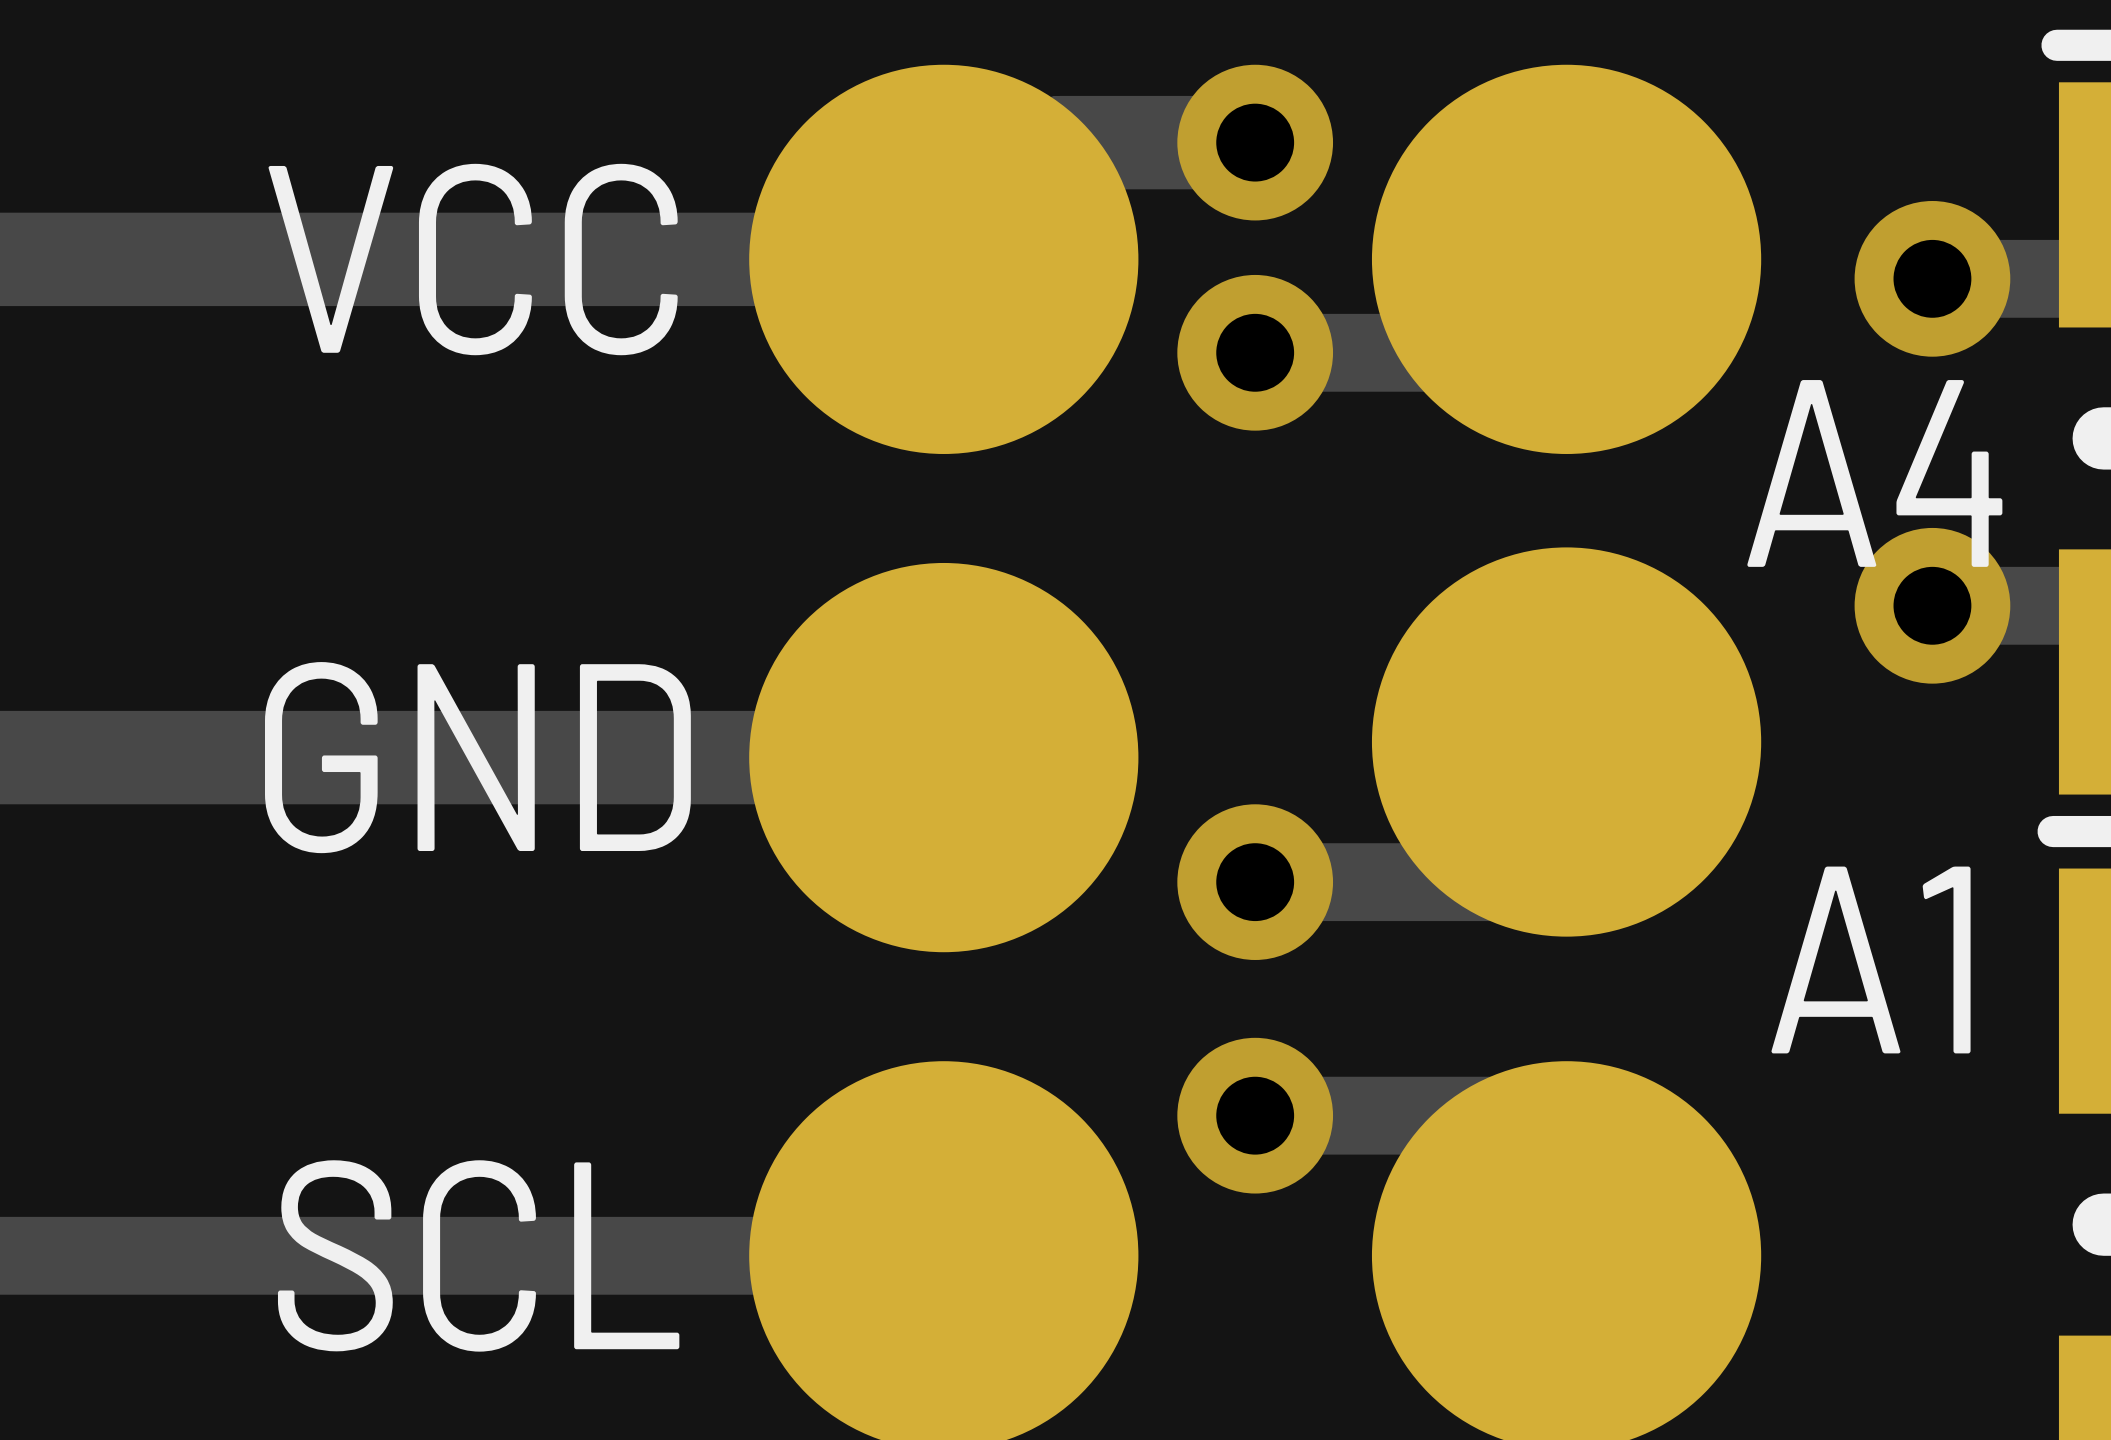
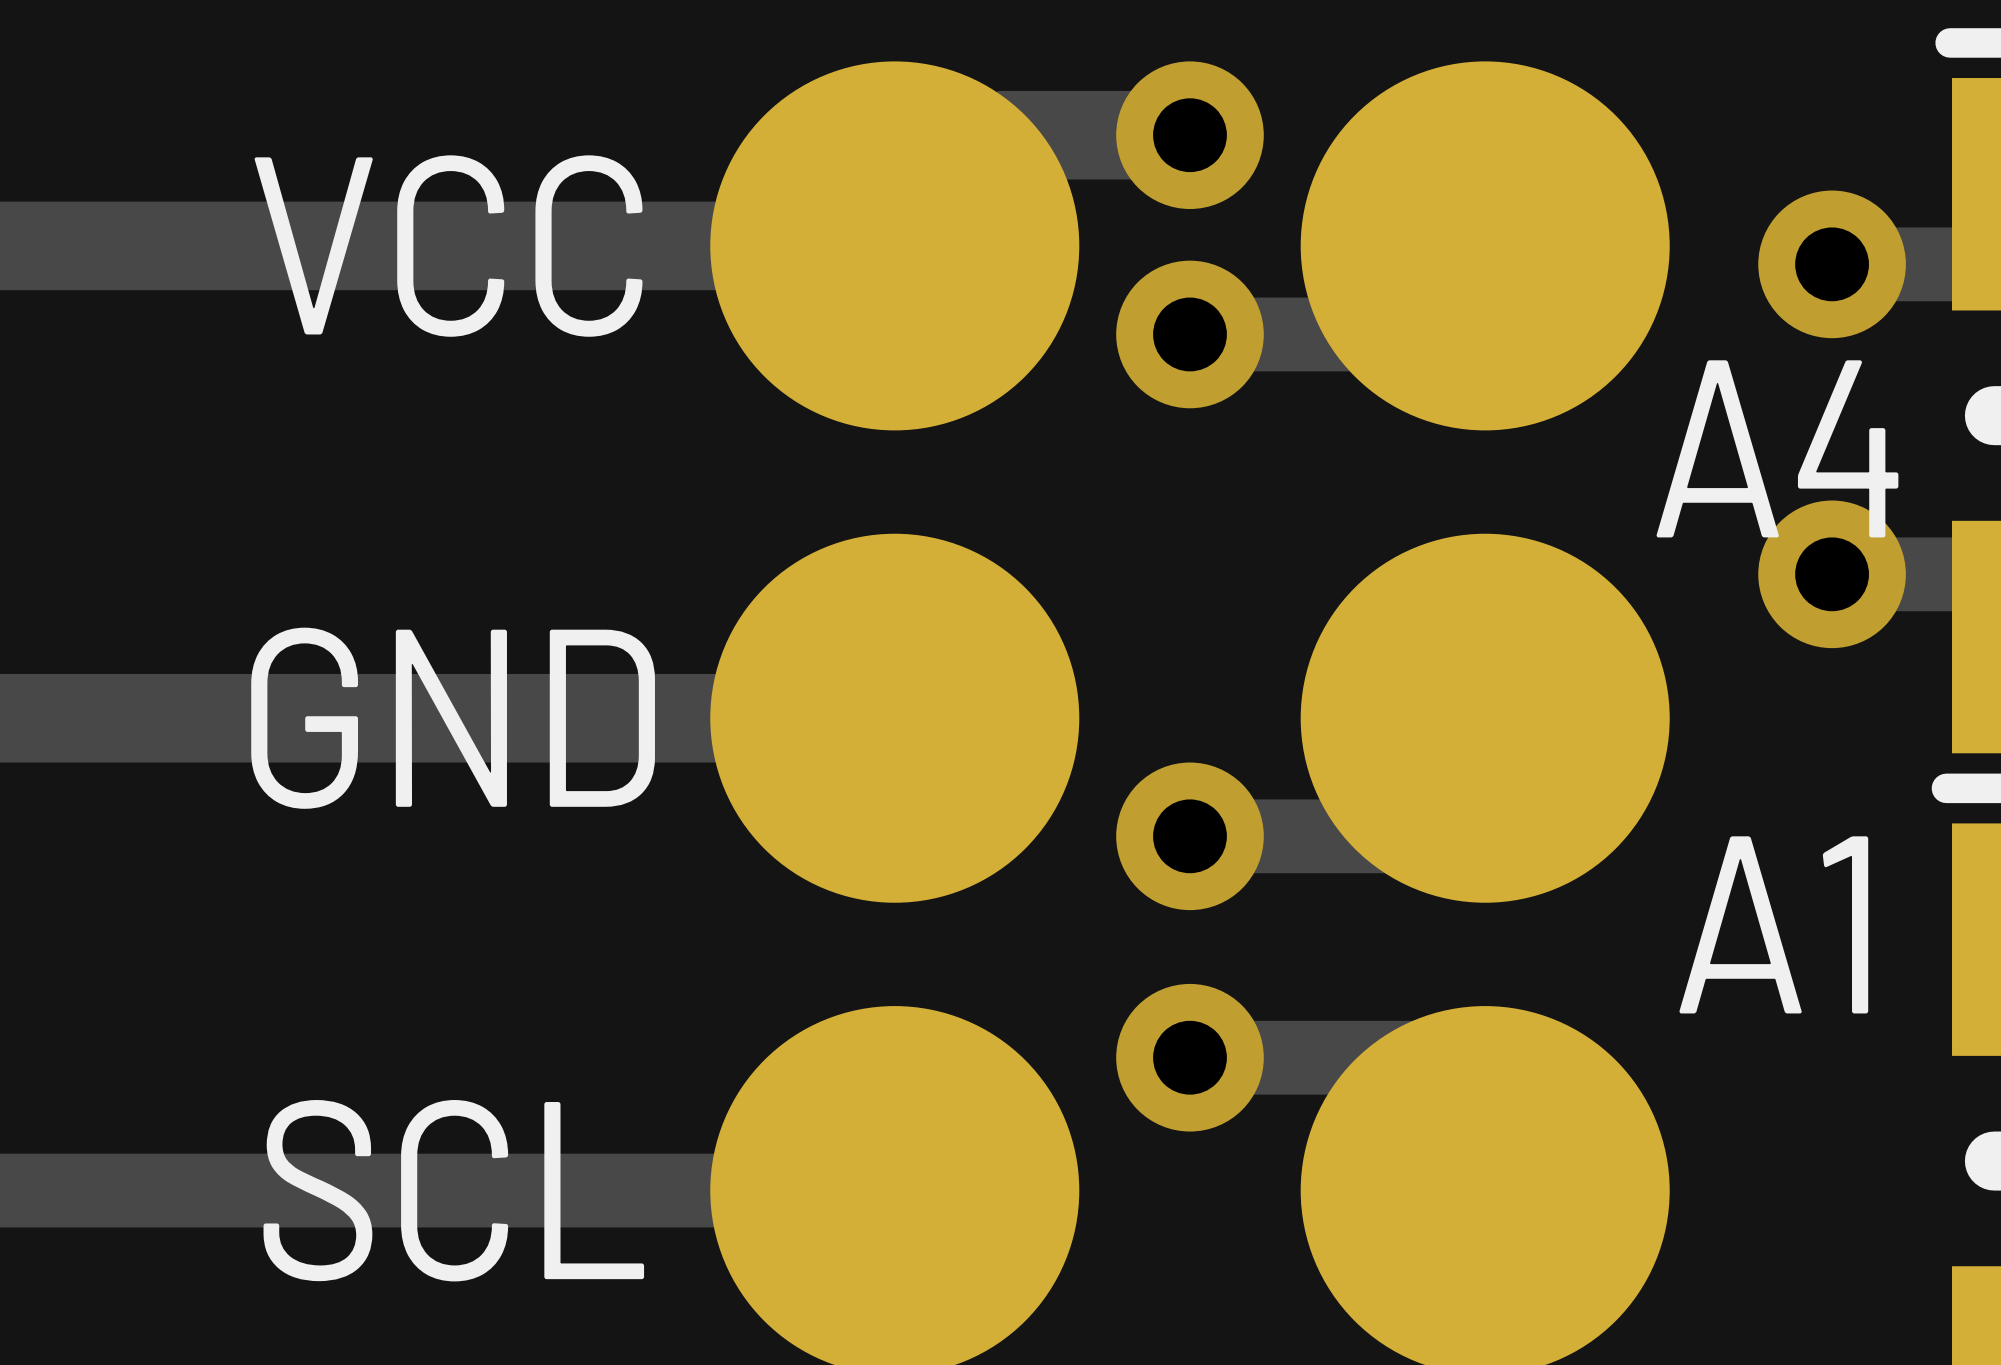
A1 position: (1566, 742) -> (1485, 718)

